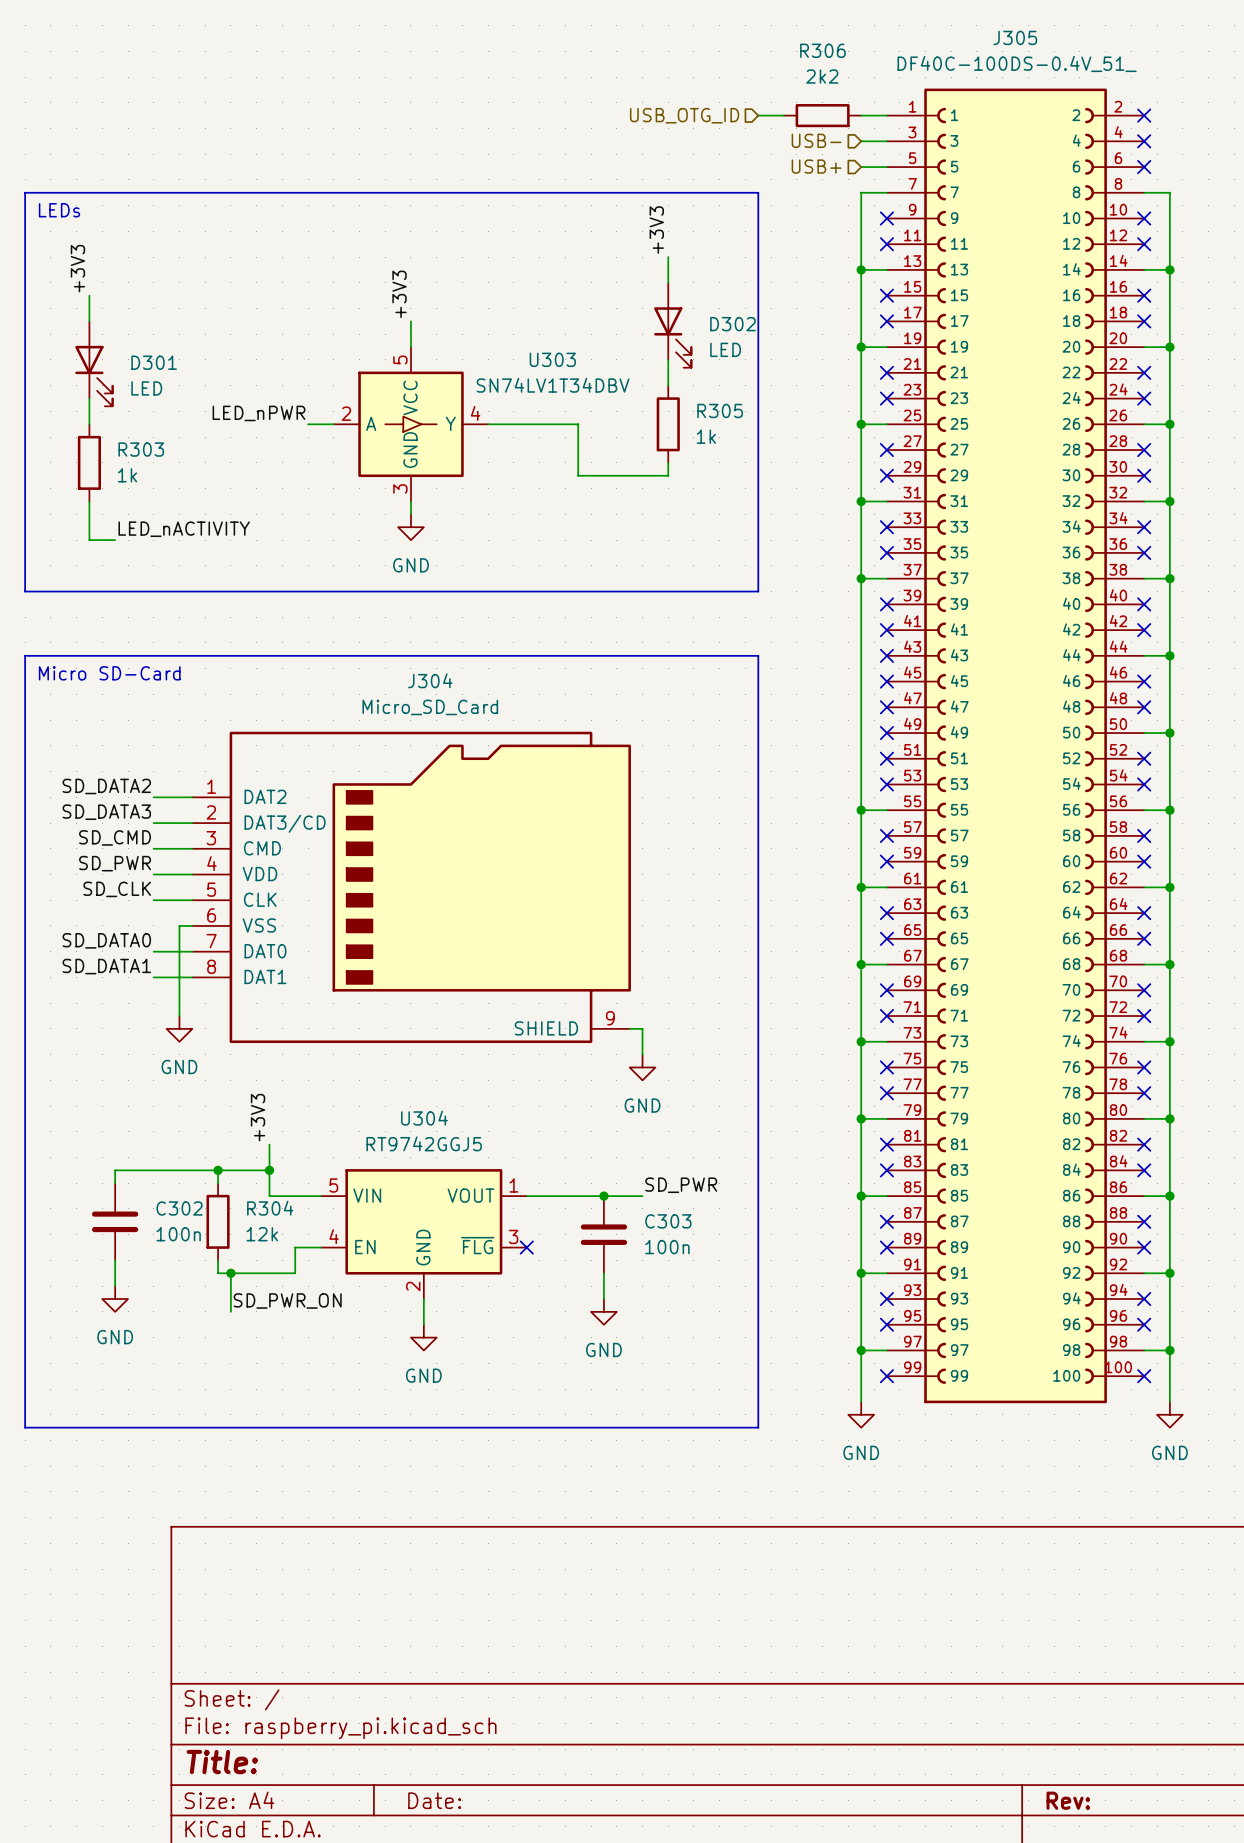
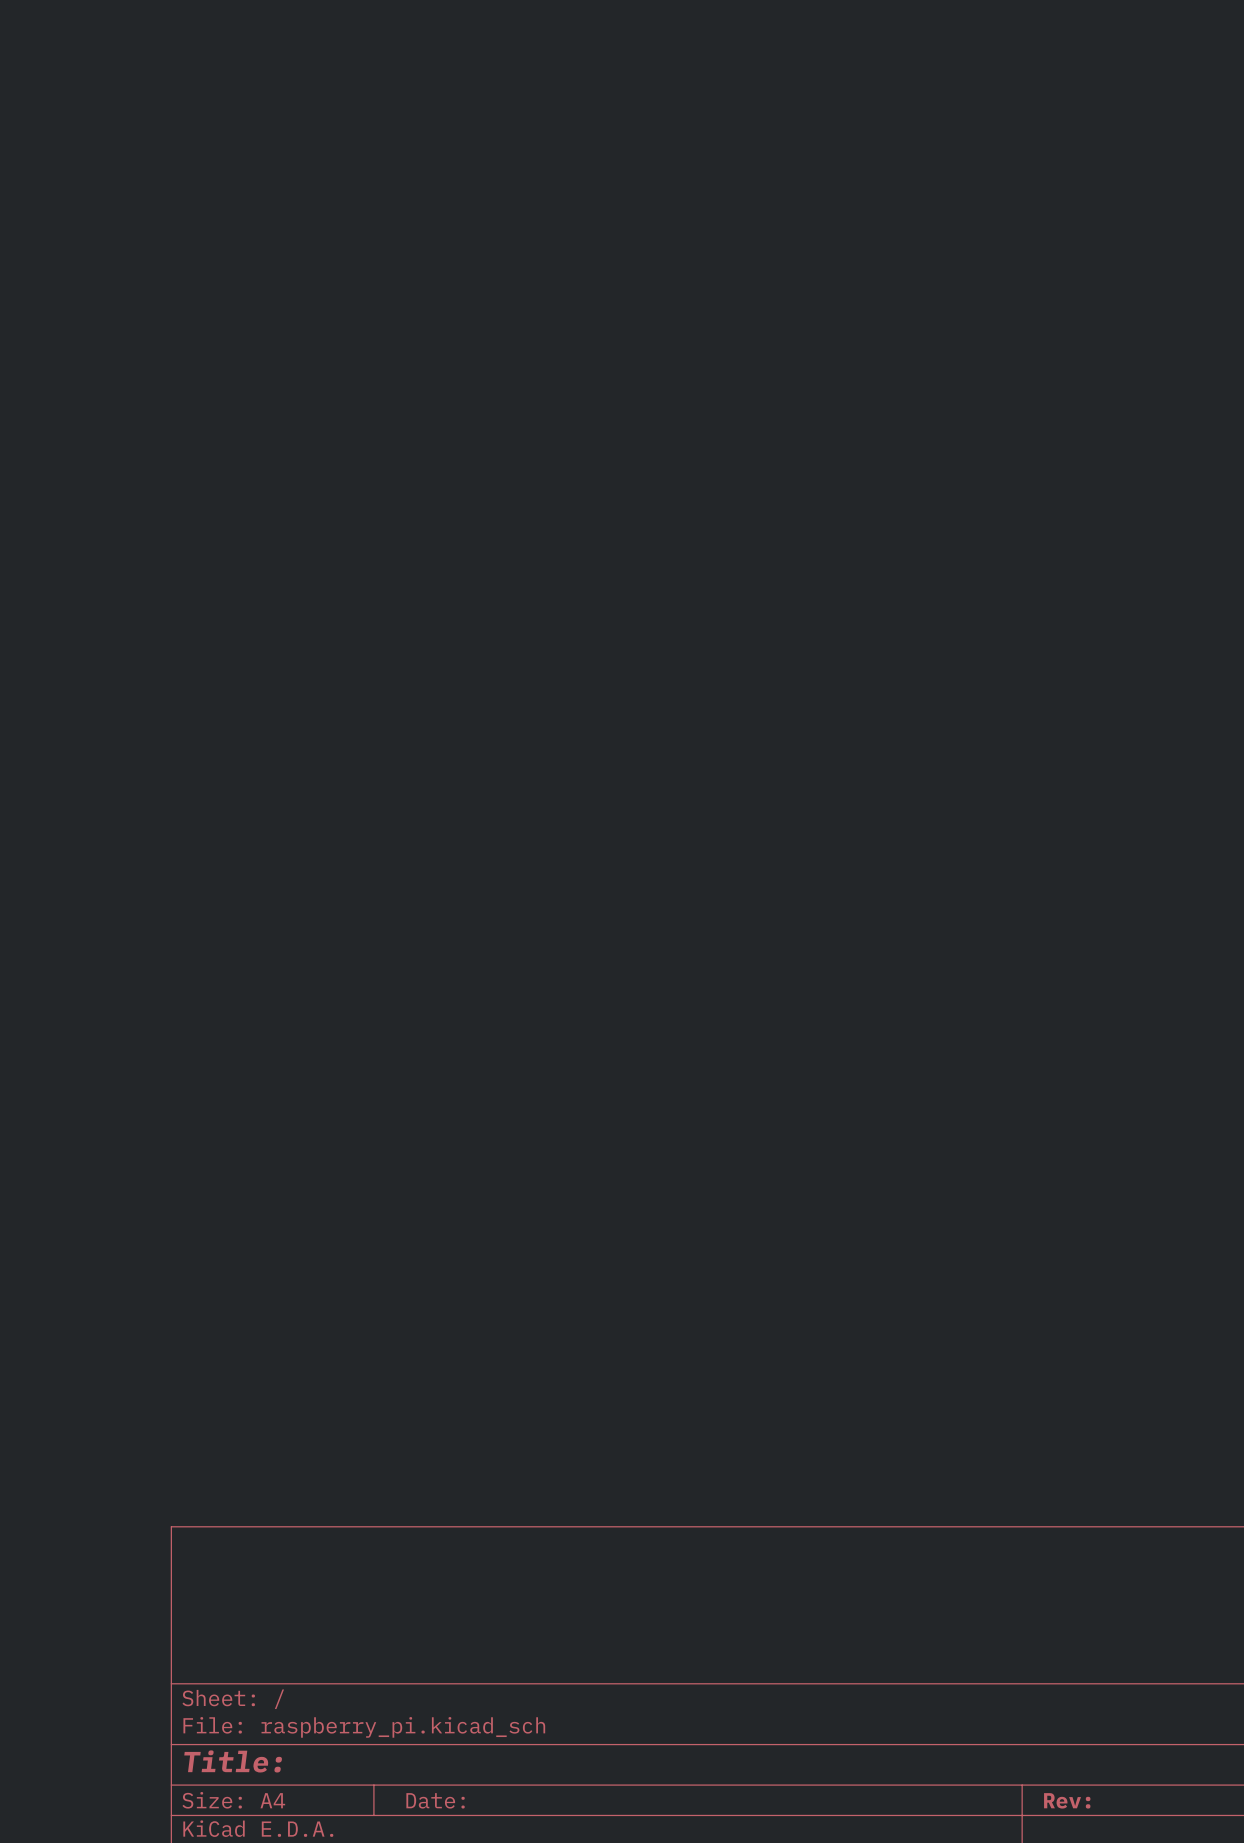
hierarchical label: USB_OTG_ID (684, 115) -> none
wire: (758, 115) (784, 115) -> none
R306: 2k2 (822, 115) -> none
wire: (861, 115) (886, 115) -> none
no-connect mark: (1144, 115) -> none
hierarchical label: USB- (816, 140) -> none
wire: (861, 141) (886, 141) -> none
no-connect mark: (1144, 141) -> none
hierarchical label: USB+ (816, 166) -> none
wire: (861, 167) (886, 167) -> none
no-connect mark: (1144, 167) -> none
line: (25, 192) (25, 591) (758, 591) (758, 192) (25, 192) -> none
wire: (886, 192) (861, 192) (861, 1401) -> none
wire: (1144, 192) (1169, 192) (1169, 1401) -> none
text: LEDs (59, 210) -> none
no-connect mark: (886, 218) -> none
no-connect mark: (1144, 218) -> none
label: +3V3 (656, 230) -> none
no-connect mark: (886, 244) -> none
no-connect mark: (1144, 244) -> none
wire: (668, 257) (668, 282) -> none
label: +3V3 (77, 268) -> none
wire: (861, 269) (886, 269) -> none
junction: (861, 269) -> none
wire: (1144, 269) (1169, 269) -> none
junction: (1169, 269) -> none
label: +3V3 (399, 294) -> none
wire: (89, 295) (89, 321) -> none
no-connect mark: (886, 295) -> none
no-connect mark: (1144, 295) -> none
wire: (410, 321) (410, 347) -> none
no-connect mark: (886, 321) -> none
no-connect mark: (1144, 321) -> none
D302: LED (672, 325) -> none
wire: (861, 347) (886, 347) -> none
junction: (861, 347) -> none
wire: (1144, 347) (1169, 347) -> none
junction: (1169, 347) -> none
wire: (668, 359) (668, 385) -> none
D301: LED (93, 363) -> none
no-connect mark: (886, 372) -> none
no-connect mark: (1144, 372) -> none
wire: (89, 398) (89, 424) -> none
no-connect mark: (886, 398) -> none
no-connect mark: (1144, 398) -> none
label: LED_nPWR (258, 413) -> none
wire: (308, 424) (333, 424) -> none
U303: SN74LV1T34DBV (410, 424) -> none
wire: (488, 424) (578, 424) (578, 475) (668, 475) (668, 462) -> none
R305: 1k (668, 424) -> none
wire: (861, 424) (886, 424) -> none
junction: (861, 424) -> none
wire: (1144, 424) (1169, 424) -> none
junction: (1169, 424) -> none
no-connect mark: (886, 450) -> none
no-connect mark: (1144, 450) -> none
R303: 1k (89, 462) -> none
no-connect mark: (886, 475) -> none
no-connect mark: (1144, 475) -> none
wire: (89, 501) (89, 540) (115, 540) -> none
wire: (410, 501) (410, 514) -> none
wire: (861, 501) (886, 501) -> none
junction: (861, 501) -> none
wire: (1144, 501) (1169, 501) -> none
junction: (1169, 501) -> none
power symbol: GND (410, 527) -> none
no-connect mark: (886, 527) -> none
no-connect mark: (1144, 527) -> none
label: LED_nACTIVITY (184, 529) -> none
no-connect mark: (886, 552) -> none
no-connect mark: (1144, 552) -> none
wire: (861, 578) (886, 578) -> none
junction: (861, 578) -> none
wire: (1144, 578) (1169, 578) -> none
junction: (1169, 578) -> none
no-connect mark: (886, 604) -> none
no-connect mark: (1144, 604) -> none
no-connect mark: (886, 630) -> none
no-connect mark: (1144, 630) -> none
line: (25, 655) (758, 655) (758, 1427) (25, 1427) (25, 655) -> none
no-connect mark: (886, 655) -> none
wire: (1144, 655) (1169, 655) -> none
junction: (1169, 655) -> none
text: Micro SD-Card (109, 673) -> none
no-connect mark: (886, 681) -> none
no-connect mark: (1144, 681) -> none
no-connect mark: (886, 707) -> none
no-connect mark: (1144, 707) -> none
no-connect mark: (886, 733) -> none
wire: (1144, 733) (1169, 733) -> none
junction: (1169, 733) -> none
J305: DF40C-100DS-0.4V_51_ (1015, 745) -> none
no-connect mark: (886, 758) -> none
no-connect mark: (1144, 758) -> none
no-connect mark: (886, 784) -> none
no-connect mark: (1144, 784) -> none
label: SD_DATA2 (106, 786) -> none
wire: (153, 797) (192, 797) -> none
wire: (861, 810) (886, 810) -> none
junction: (861, 810) -> none
wire: (1144, 810) (1169, 810) -> none
junction: (1169, 810) -> none
label: SD_DATA3 (106, 812) -> none
wire: (153, 823) (192, 823) -> none
no-connect mark: (886, 835) -> none
no-connect mark: (1144, 835) -> none
label: SD_CMD (115, 837) -> none
wire: (153, 848) (192, 848) -> none
no-connect mark: (886, 861) -> none
no-connect mark: (1144, 861) -> none
label: SD_PWR (115, 863) -> none
wire: (153, 874) (192, 874) -> none
J304: Micro_SD_Card (411, 887) -> none
wire: (861, 887) (886, 887) -> none
junction: (861, 887) -> none
wire: (1144, 887) (1169, 887) -> none
junction: (1169, 887) -> none
label: SD_CLK (117, 889) -> none
wire: (153, 900) (192, 900) -> none
no-connect mark: (886, 913) -> none
no-connect mark: (1144, 913) -> none
wire: (192, 925) (179, 925) (179, 1016) -> none
no-connect mark: (886, 938) -> none
no-connect mark: (1144, 938) -> none
label: SD_DATA0 (106, 940) -> none
wire: (153, 951) (192, 951) -> none
wire: (861, 964) (886, 964) -> none
junction: (861, 964) -> none
wire: (1144, 964) (1169, 964) -> none
junction: (1169, 964) -> none
label: SD_DATA1 (106, 966) -> none
wire: (153, 977) (192, 977) -> none
no-connect mark: (886, 990) -> none
no-connect mark: (1144, 990) -> none
no-connect mark: (886, 1016) -> none
no-connect mark: (1144, 1016) -> none
power symbol: GND (179, 1028) -> none
wire: (629, 1028) (642, 1028) (642, 1054) -> none
wire: (861, 1041) (886, 1041) -> none
junction: (861, 1041) -> none
wire: (1144, 1041) (1169, 1041) -> none
junction: (1169, 1041) -> none
power symbol: GND (642, 1067) -> none
no-connect mark: (886, 1067) -> none
no-connect mark: (1144, 1067) -> none
no-connect mark: (886, 1093) -> none
no-connect mark: (1144, 1093) -> none
label: +3V3 (258, 1117) -> none
wire: (861, 1118) (886, 1118) -> none
junction: (861, 1118) -> none
wire: (1144, 1118) (1169, 1118) -> none
junction: (1169, 1118) -> none
wire: (269, 1144) (269, 1196) (320, 1196) -> none
no-connect mark: (886, 1144) -> none
no-connect mark: (1144, 1144) -> none
wire: (218, 1170) (218, 1183) -> none
junction: (218, 1170) -> none
wire: (269, 1170) (115, 1170) (115, 1183) -> none
junction: (269, 1170) -> none
no-connect mark: (886, 1170) -> none
no-connect mark: (1144, 1170) -> none
label: SD_PWR (681, 1185) -> none
wire: (526, 1196) (642, 1196) -> none
junction: (603, 1196) -> none
wire: (861, 1196) (886, 1196) -> none
junction: (861, 1196) -> none
wire: (1144, 1196) (1169, 1196) -> none
junction: (1169, 1196) -> none
C302: 100n (115, 1221) -> none
R304: 12k (218, 1221) -> none
no-connect mark: (886, 1221) -> none
no-connect mark: (1144, 1221) -> none
U304: RT9742GGJ5 (423, 1234) -> none
C303: 100n (603, 1234) -> none
wire: (320, 1247) (295, 1247) (295, 1273) (218, 1273) (218, 1260) -> none
no-connect mark: (526, 1247) -> none
no-connect mark: (886, 1247) -> none
no-connect mark: (1144, 1247) -> none
wire: (115, 1260) (115, 1286) -> none
wire: (230, 1273) (230, 1311) -> none
junction: (230, 1273) -> none
wire: (603, 1273) (603, 1299) -> none
wire: (861, 1273) (886, 1273) -> none
junction: (861, 1273) -> none
wire: (1144, 1273) (1169, 1273) -> none
junction: (1169, 1273) -> none
power symbol: GND (115, 1299) -> none
wire: (423, 1299) (423, 1324) -> none
no-connect mark: (886, 1299) -> none
no-connect mark: (1144, 1299) -> none
label: SD_PWR_ON (287, 1301) -> none
power symbol: GND (603, 1311) -> none
no-connect mark: (886, 1324) -> none
no-connect mark: (1144, 1324) -> none
power symbol: GND (423, 1337) -> none
wire: (861, 1350) (886, 1350) -> none
junction: (861, 1350) -> none
wire: (1144, 1350) (1169, 1350) -> none
junction: (1169, 1350) -> none
no-connect mark: (886, 1376) -> none
no-connect mark: (1144, 1376) -> none
power symbol: GND (861, 1414) -> none
power symbol: GND (1169, 1414) -> none

